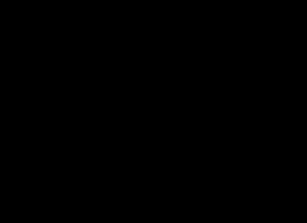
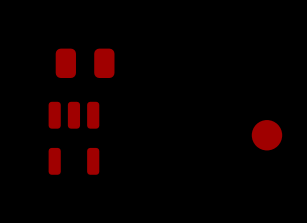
part: none -> (85, 63)
part: none -> (266, 135)
part: none -> (73, 138)

